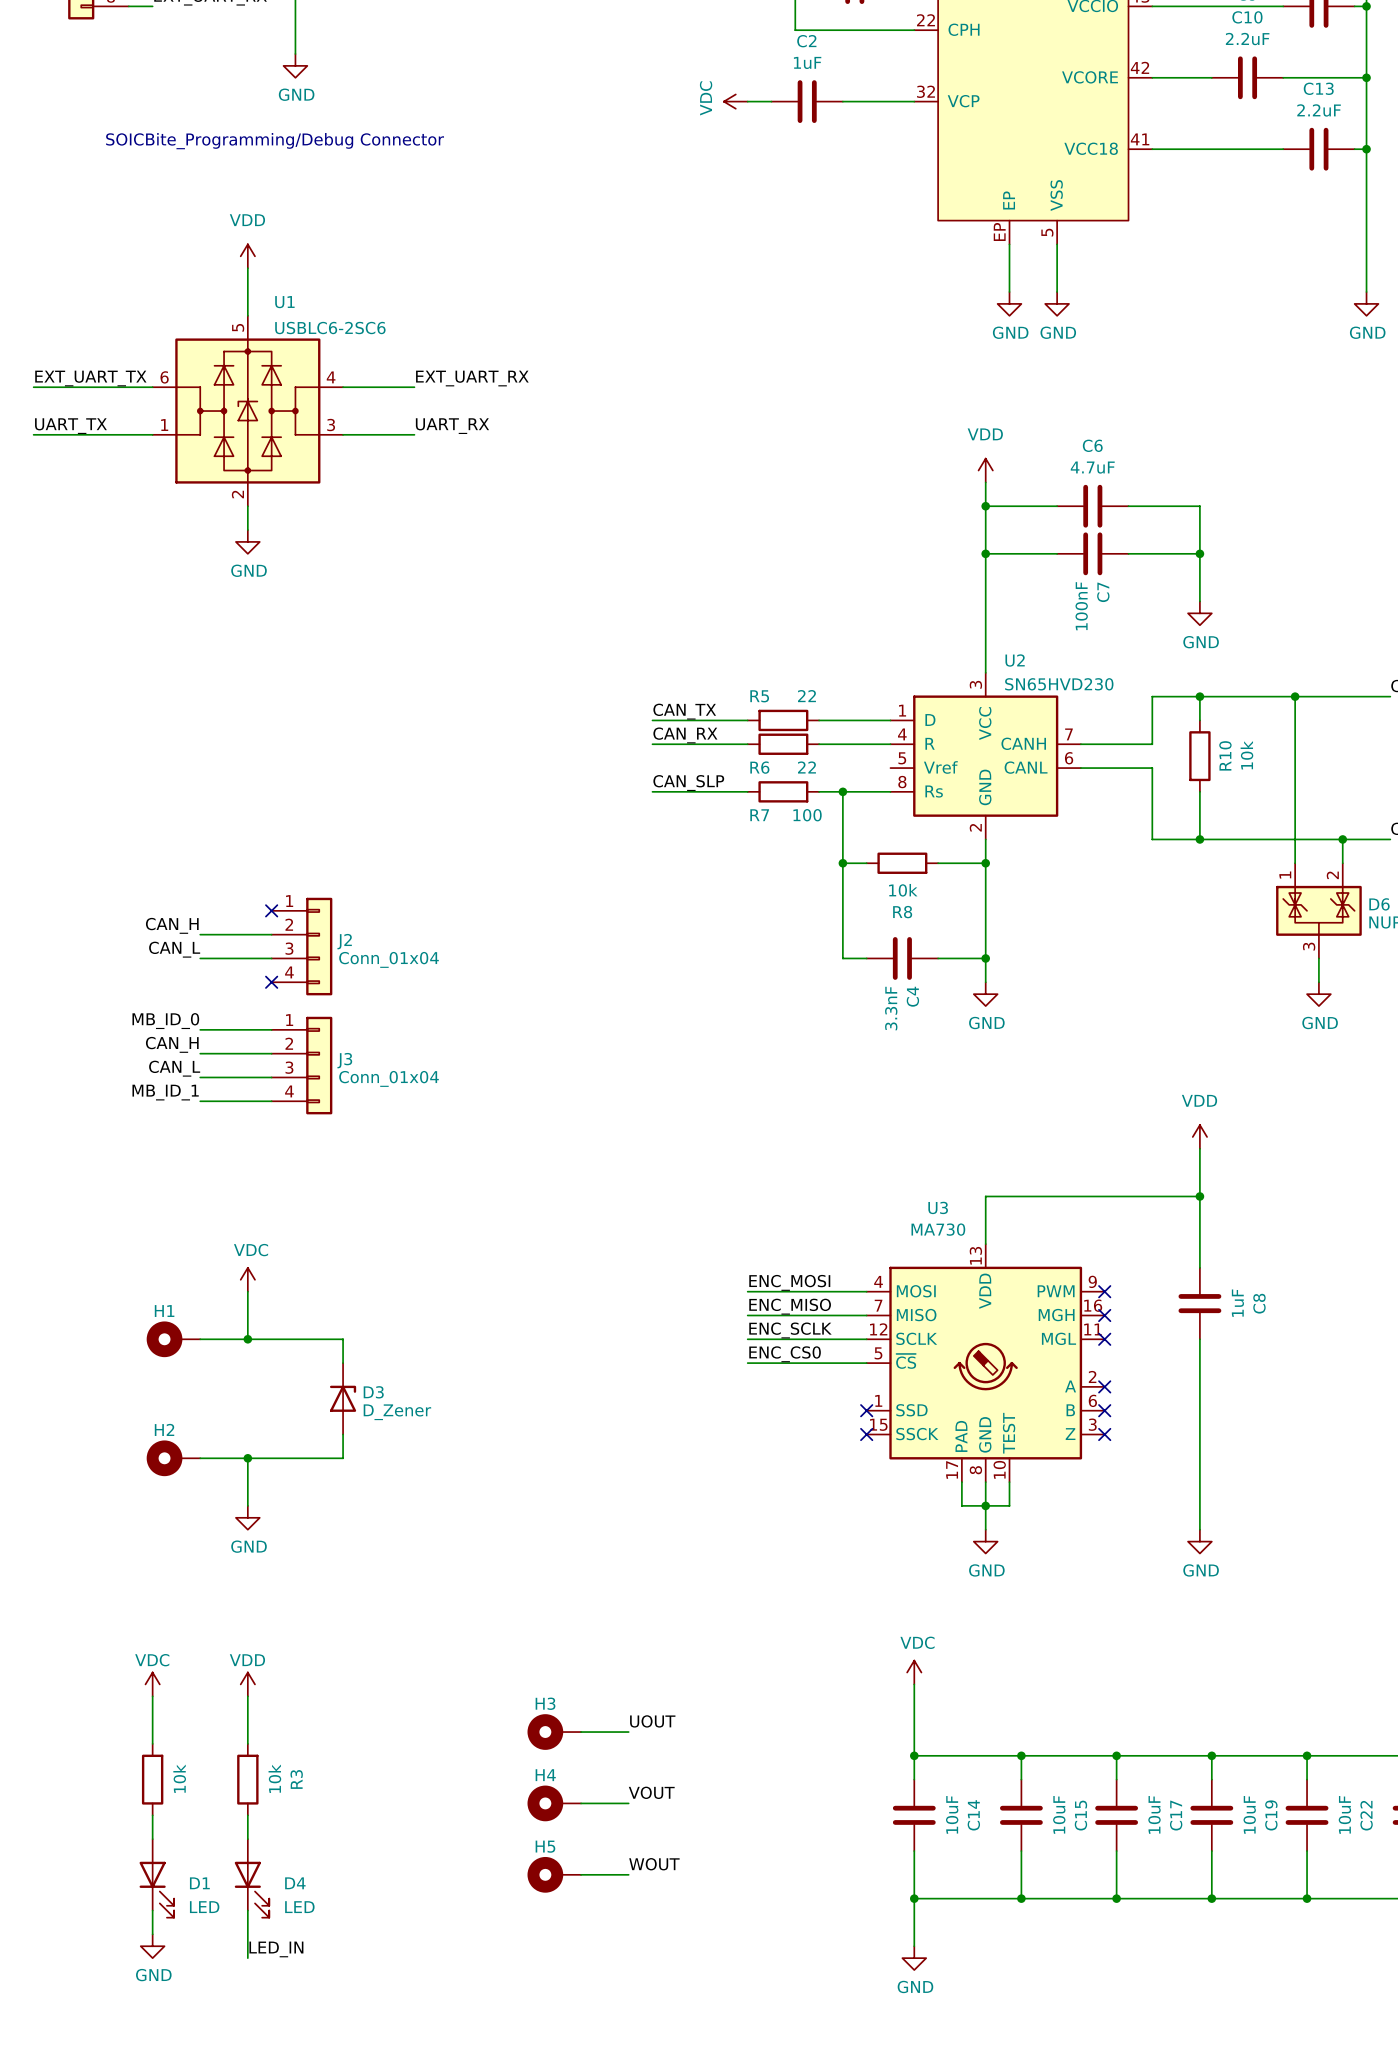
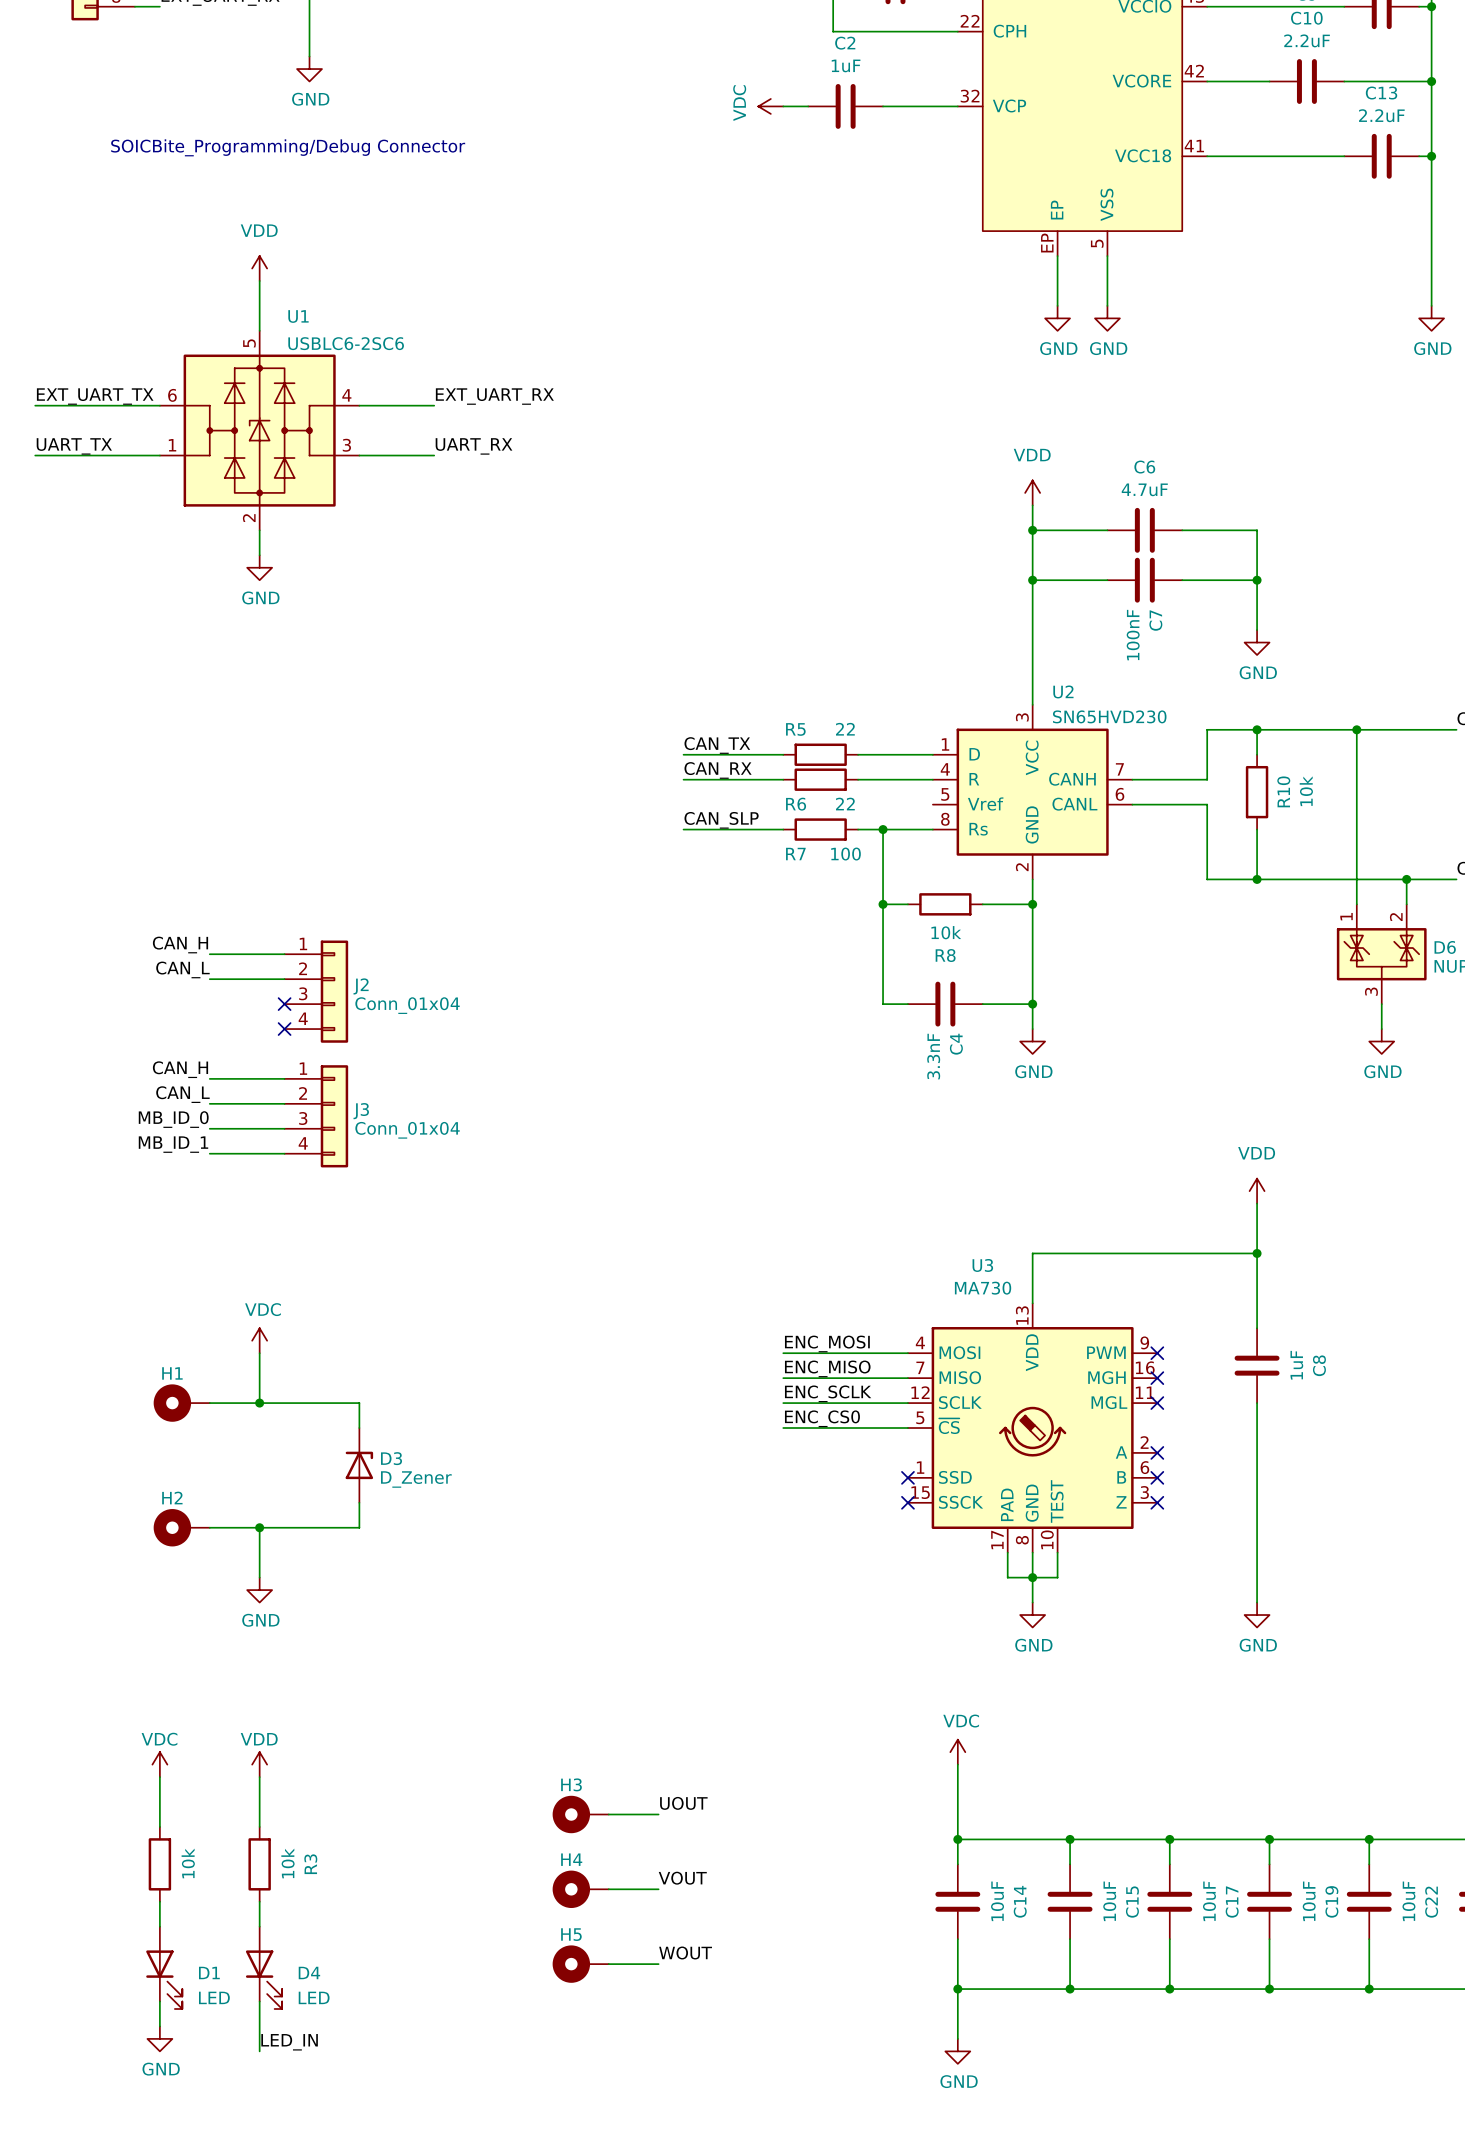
label: none -> CAN_H (180, 945)
no-connect mark position: (271, 910) -> (284, 1004)
label: CAN_H (172, 925) -> CAN_L (182, 969)
label: CAN_L (174, 949) -> none
wire: (200, 958) (271, 958) -> (209, 954) (284, 954)
label: MB_ID_0 (165, 1021) -> CAN_H (180, 1069)
label: CAN_H (172, 1044) -> CAN_L (182, 1094)
label: CAN_L (174, 1068) -> MB_ID_0 (173, 1119)

